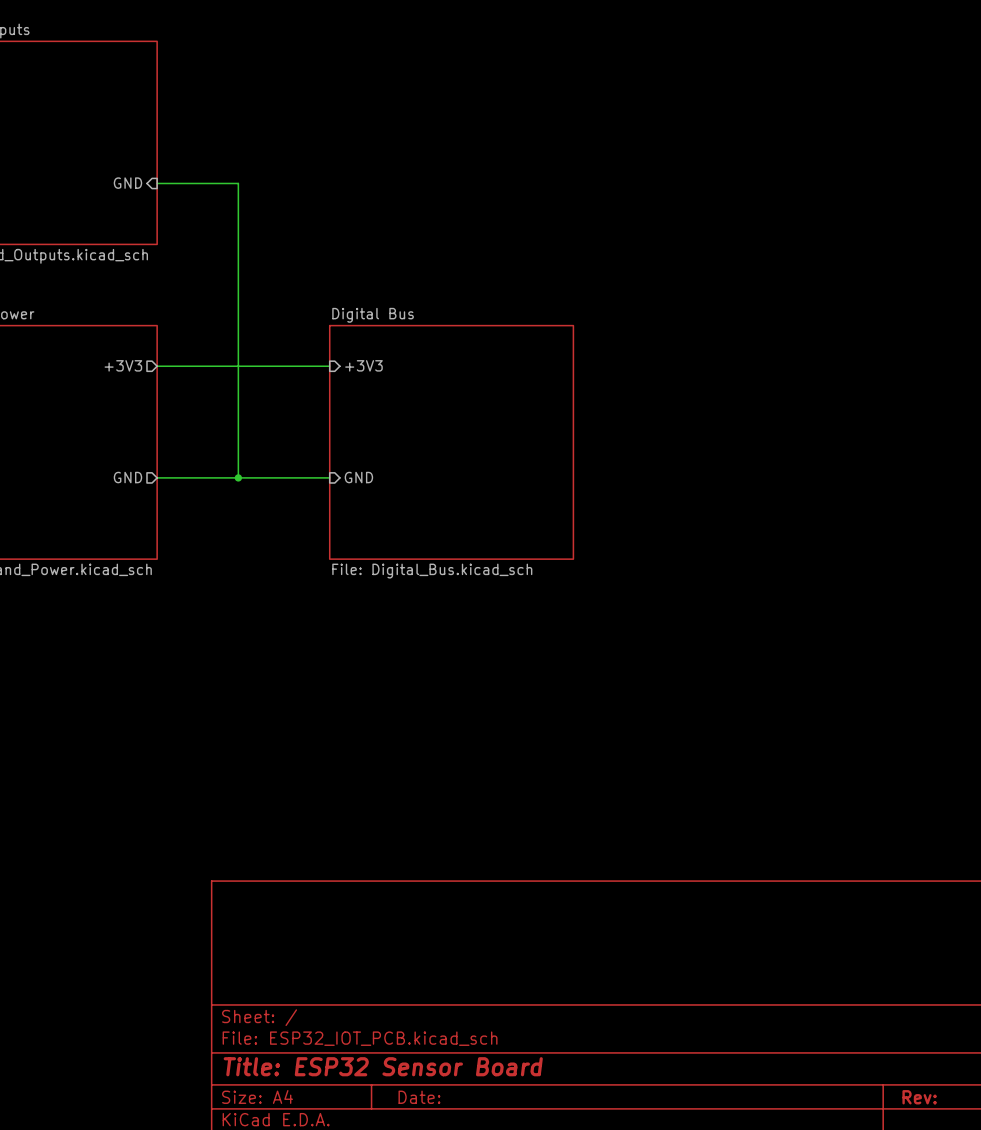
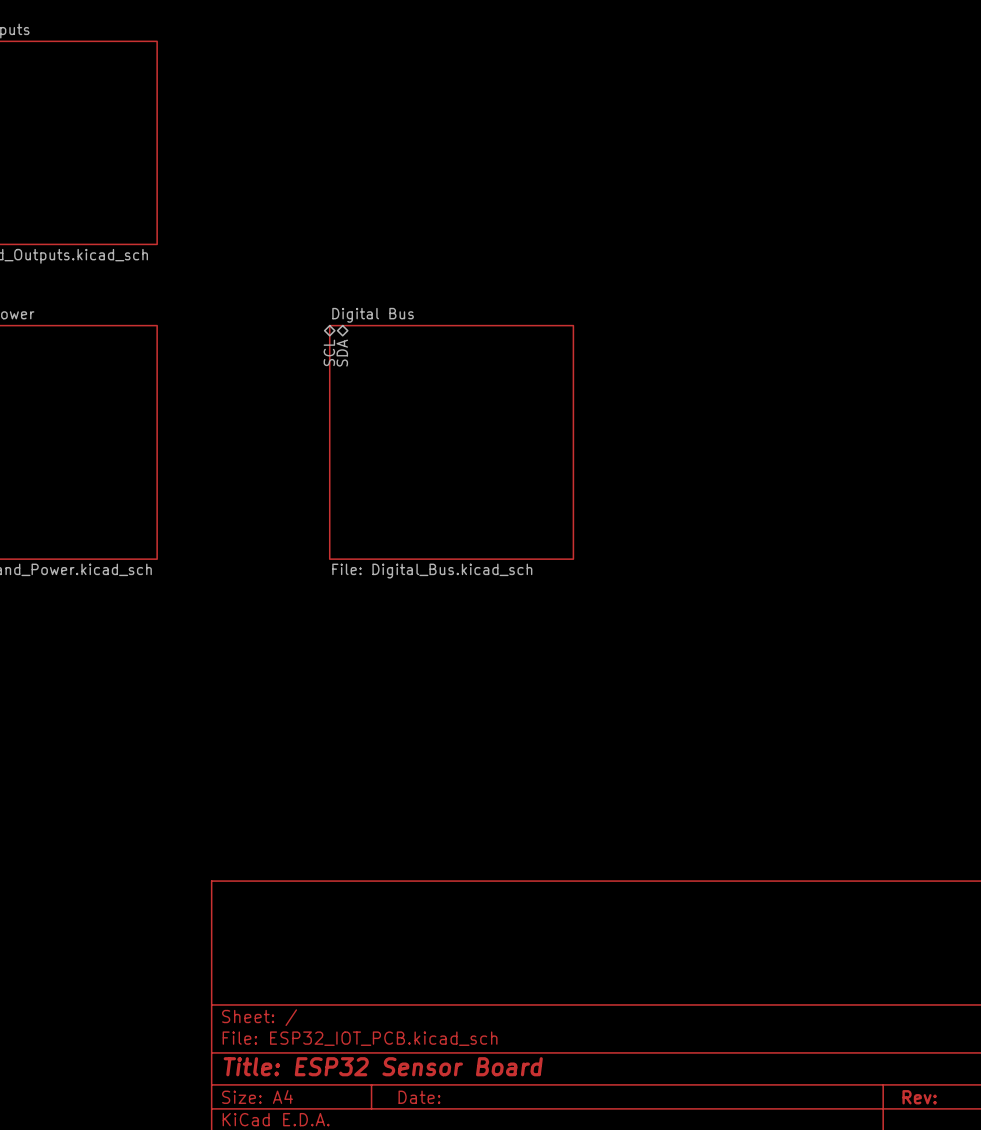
sheet pin: GND (127, 183) -> none
wire: (157, 183) (238, 183) (238, 477) -> none
sheet pin: none -> SCL (329, 352)
sheet pin: none -> SDA (342, 353)
sheet pin: +3V3 (123, 365) -> none
sheet pin: +3V3 (363, 365) -> none
wire: (157, 366) (329, 366) -> none
sheet pin: GND (127, 477) -> none
wire: (157, 477) (329, 477) -> none
junction: (238, 477) -> none
sheet pin: GND (358, 477) -> none

